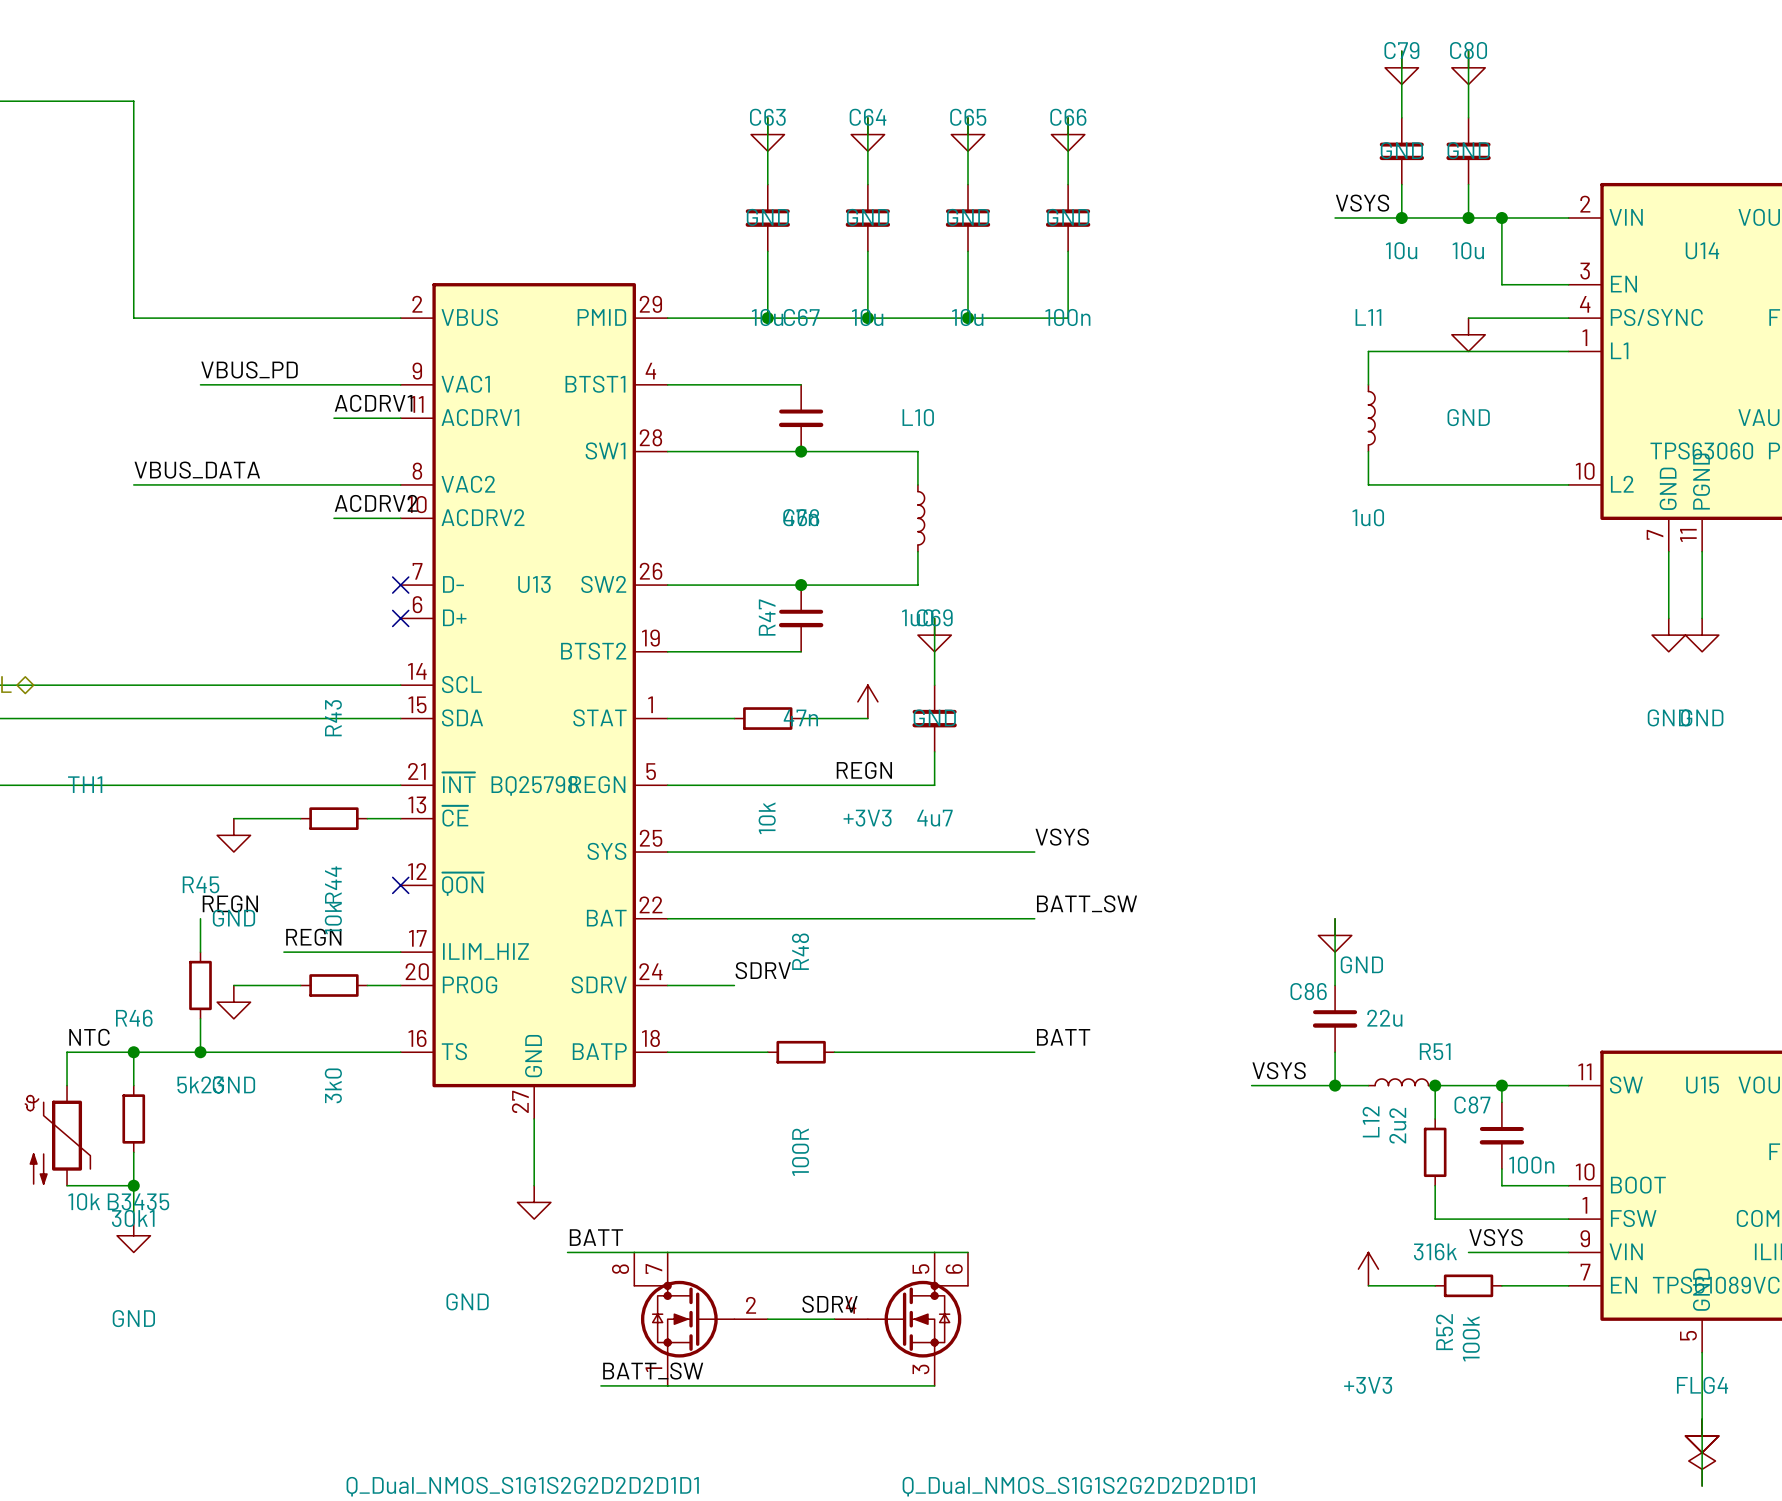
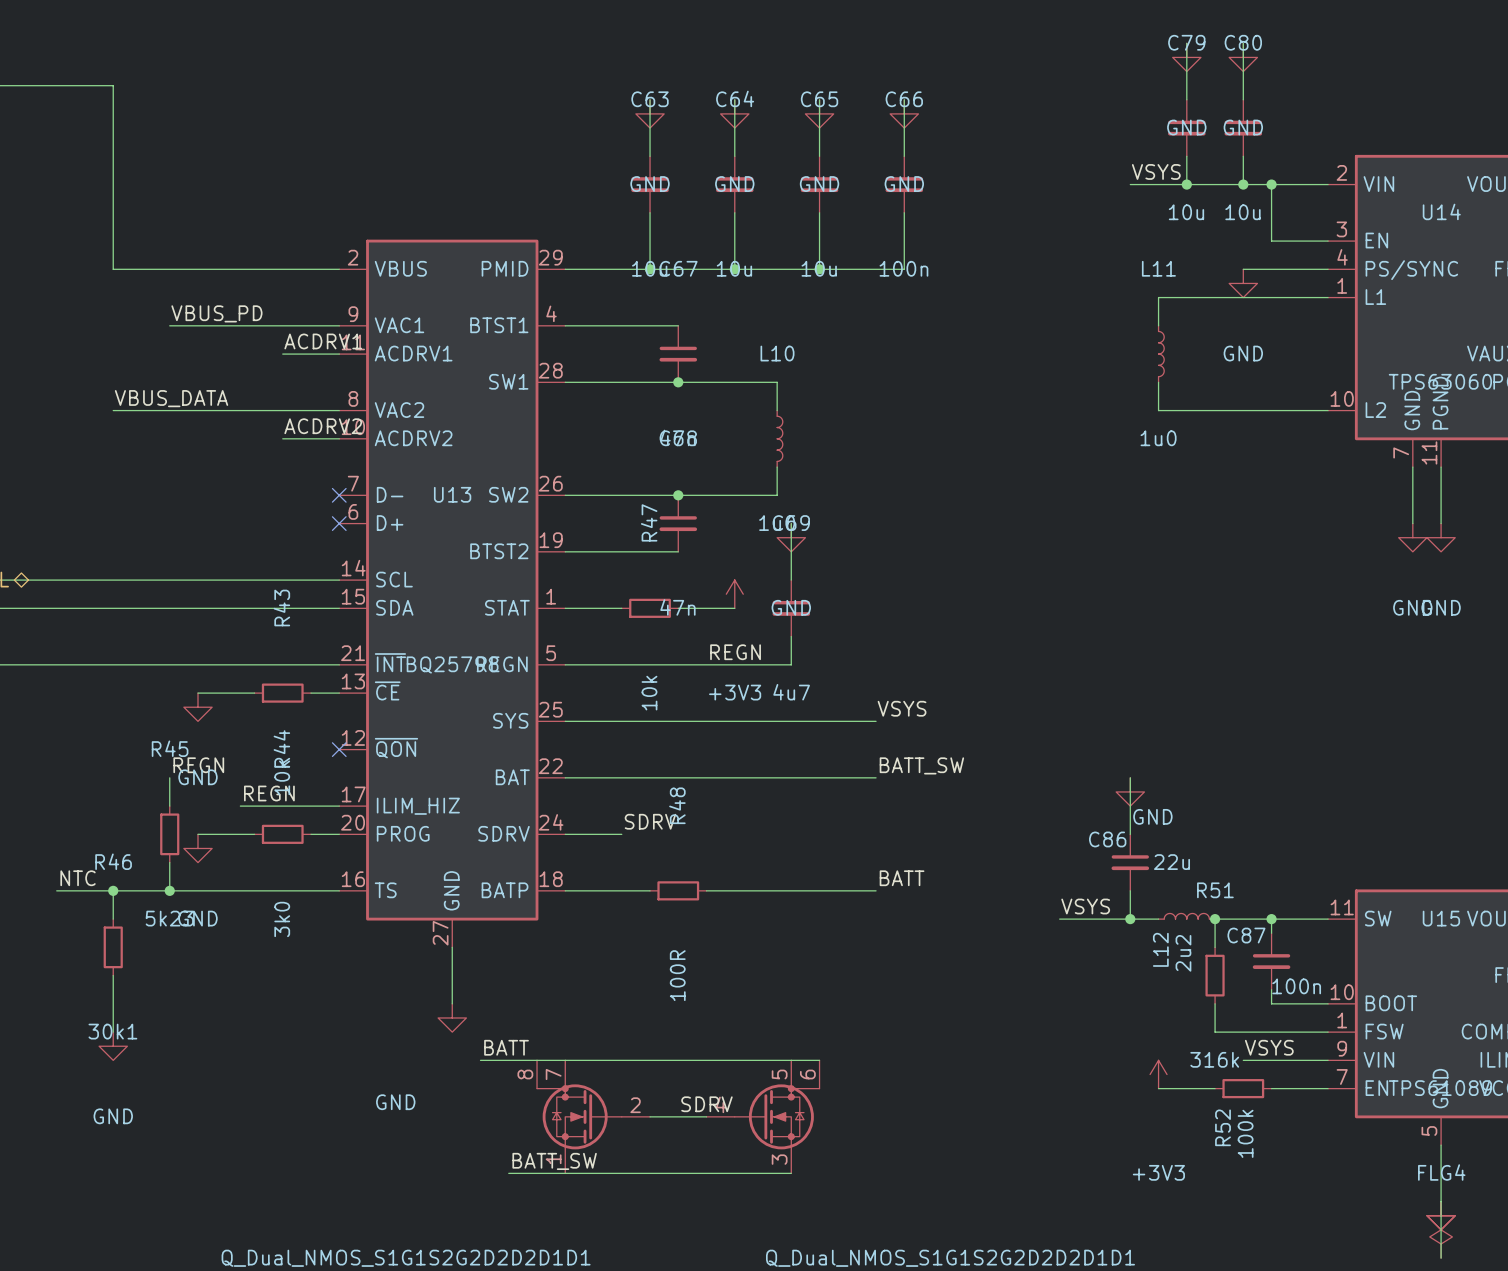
wire: (67, 1052) (67, 1085) -> none
TH1: 10k B3435 (57, 1135) -> none
wire: (67, 1185) (133, 1185) -> none
junction: (133, 1185) -> none

